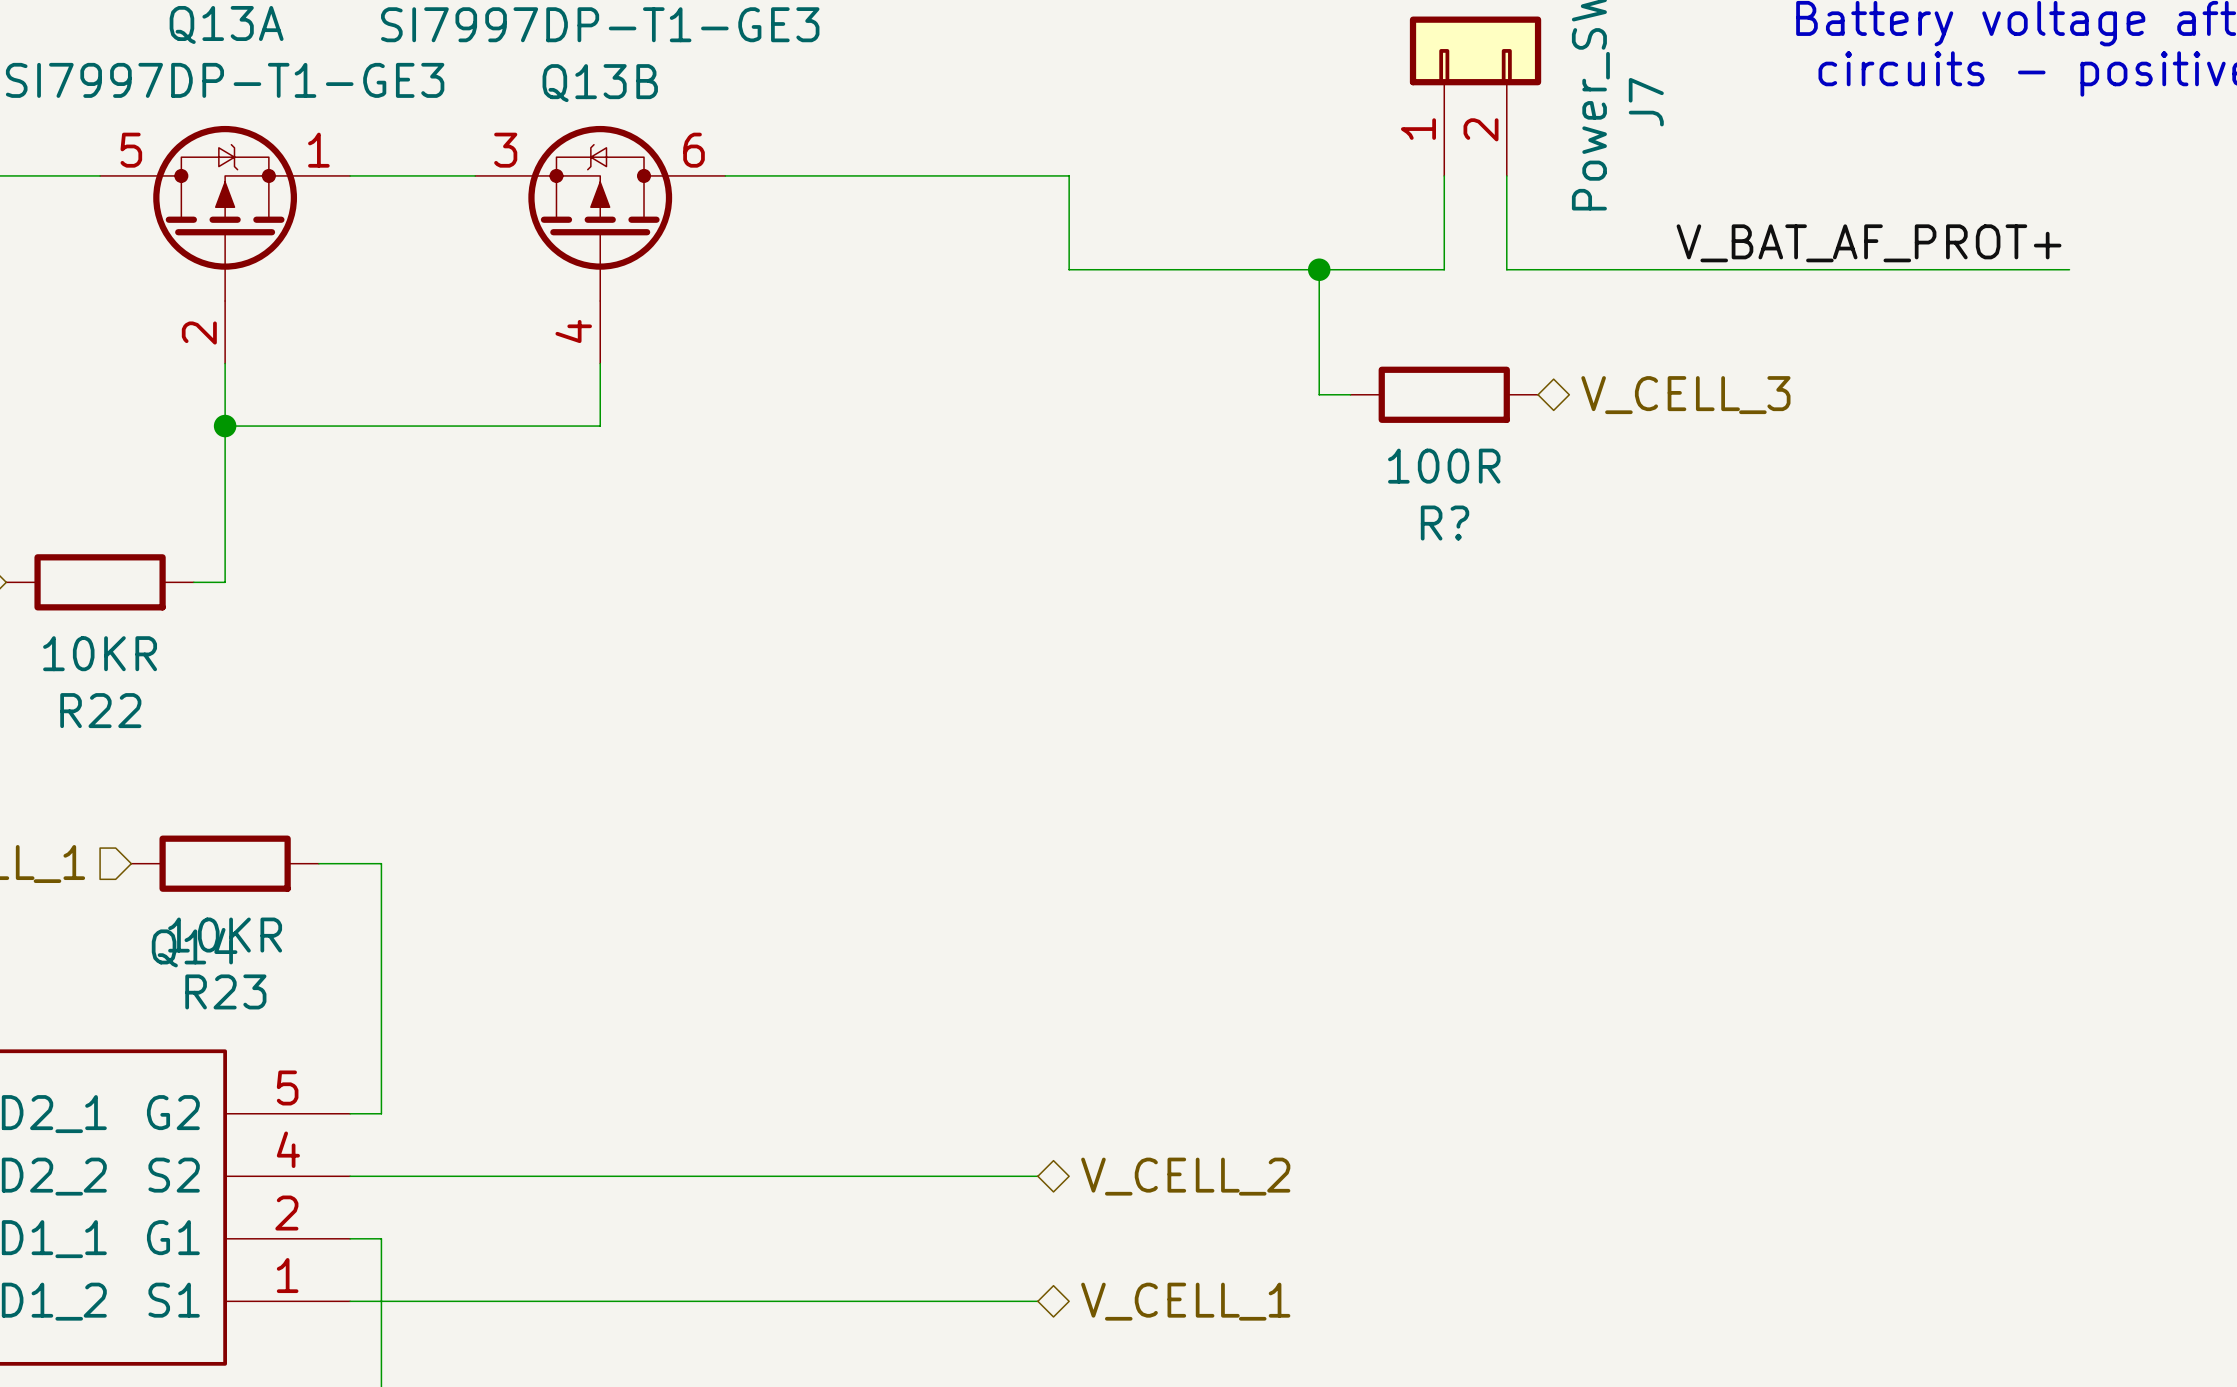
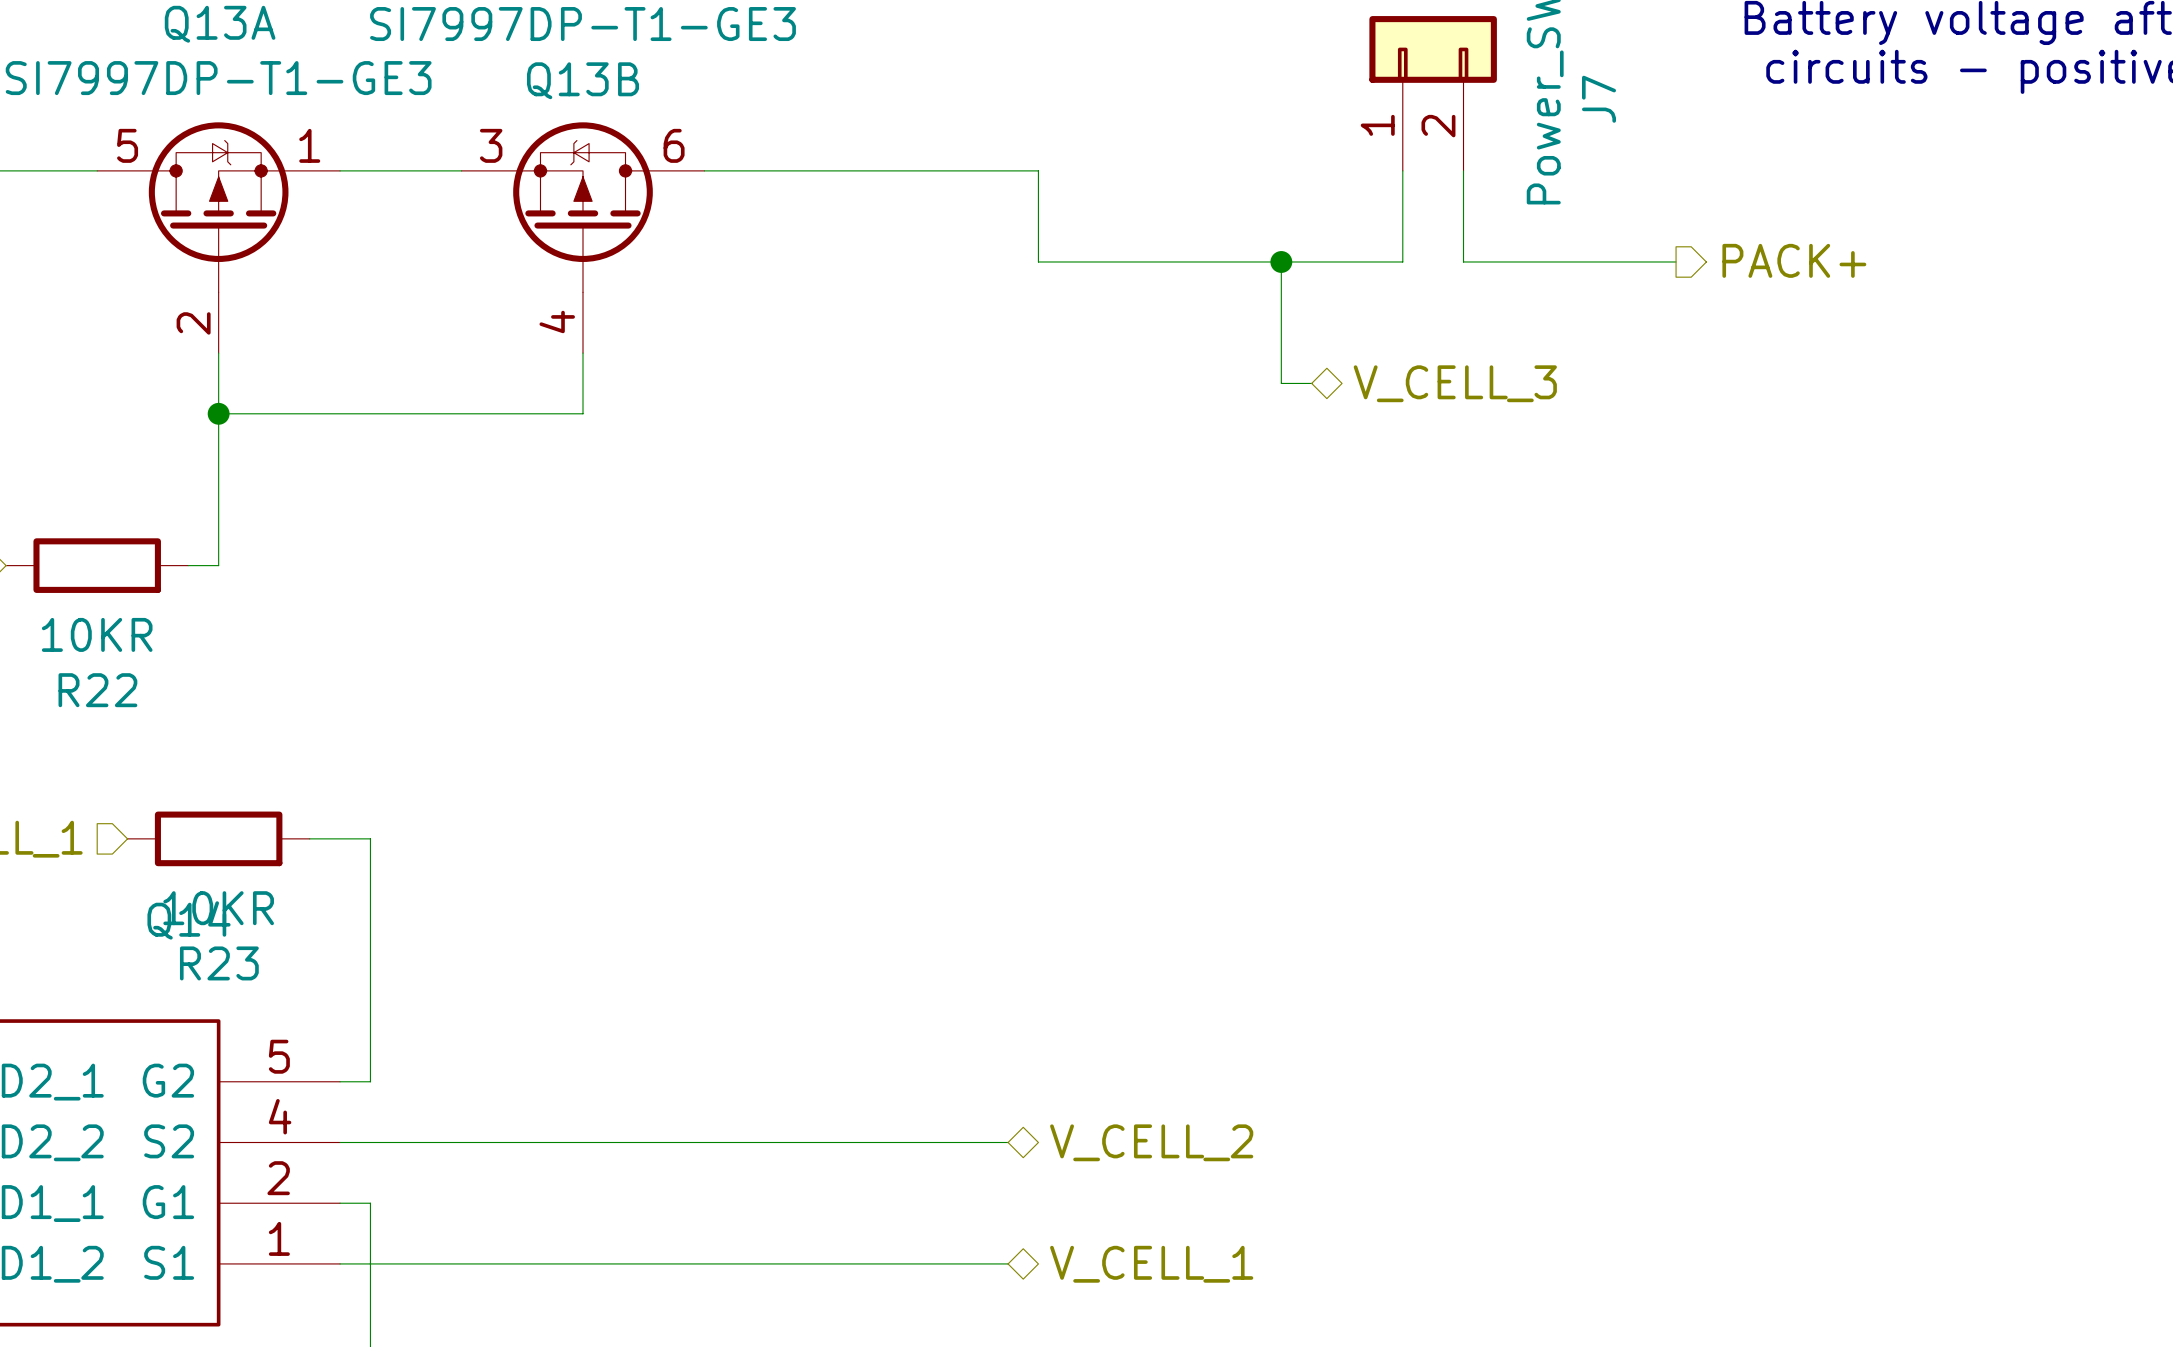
label: V_BAT_AF_PROT+ (1869, 243) -> none
hierarchical label: none -> PACK+ (1794, 260)
wire: (1725, 269) (2069, 269) -> none
R?: 100R (1444, 394) -> none
hierarchical label position: V_CELL_3 (1685, 395) -> V_CELL_3 (1455, 383)

